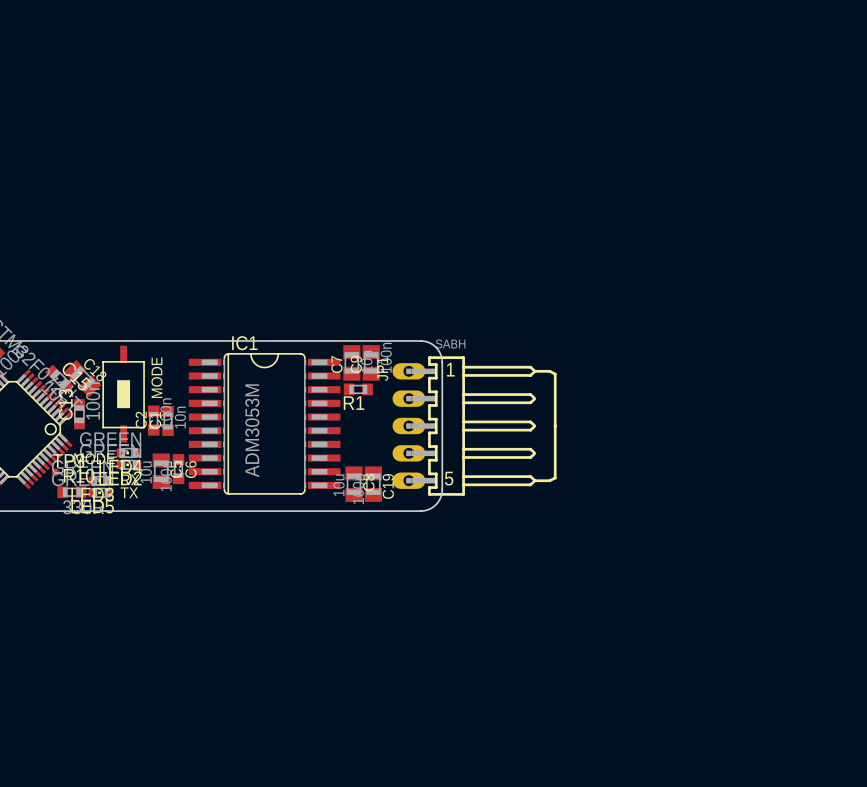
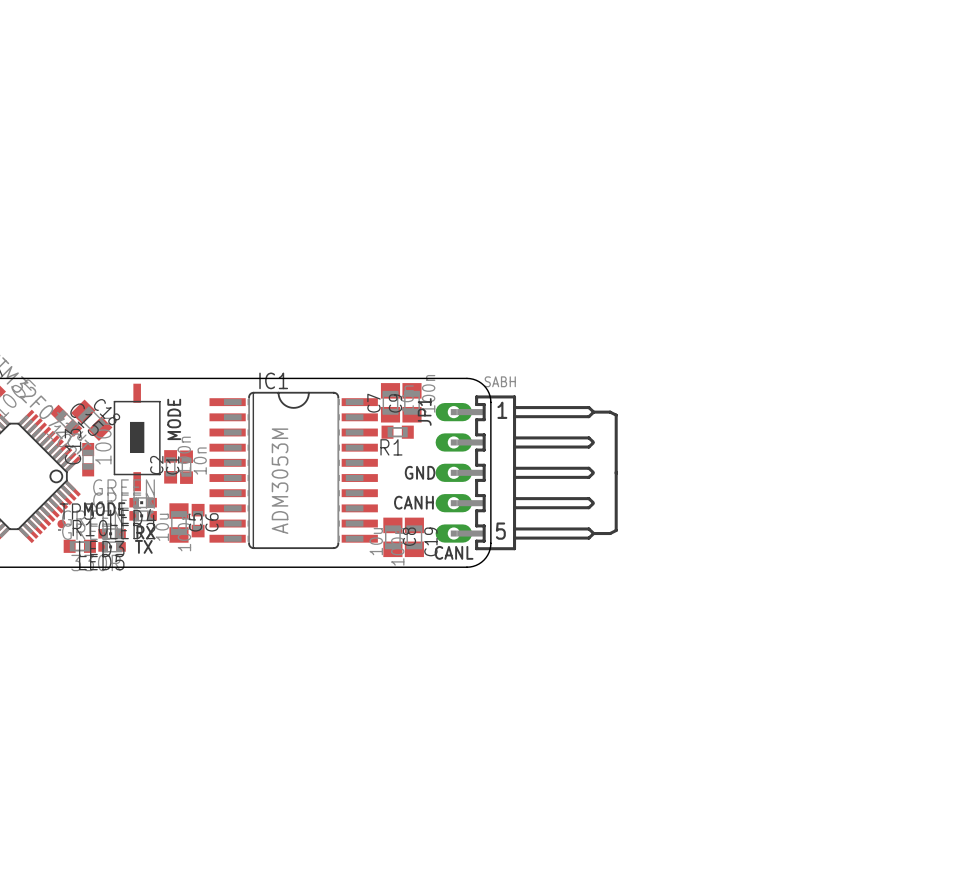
text: none -> GND (420, 472)
text: none -> CANH (413, 502)
text: none -> CANL (454, 552)

